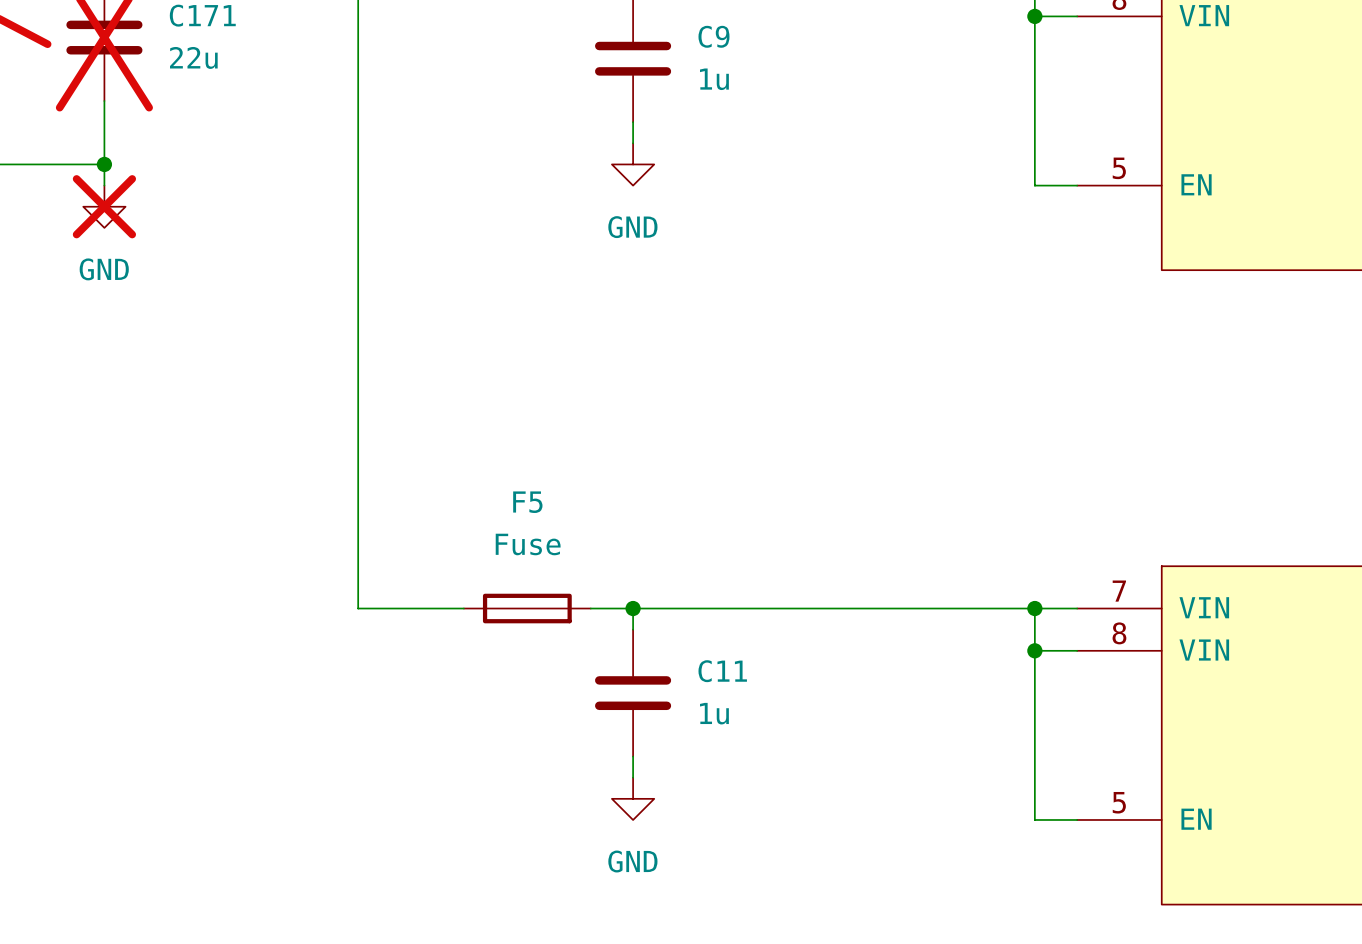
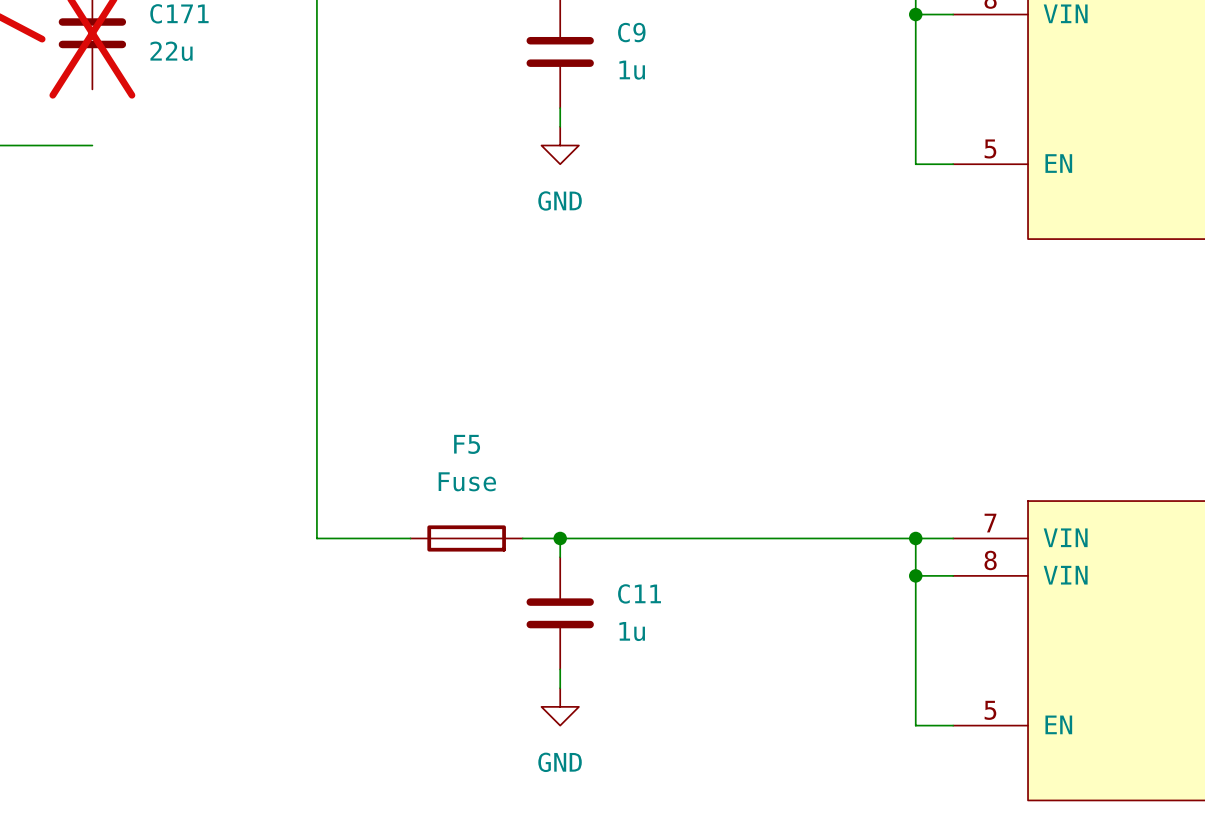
wire: (104, 101) (104, 185) -> none
junction: (104, 164) -> none
power symbol: GND (104, 206) -> none

